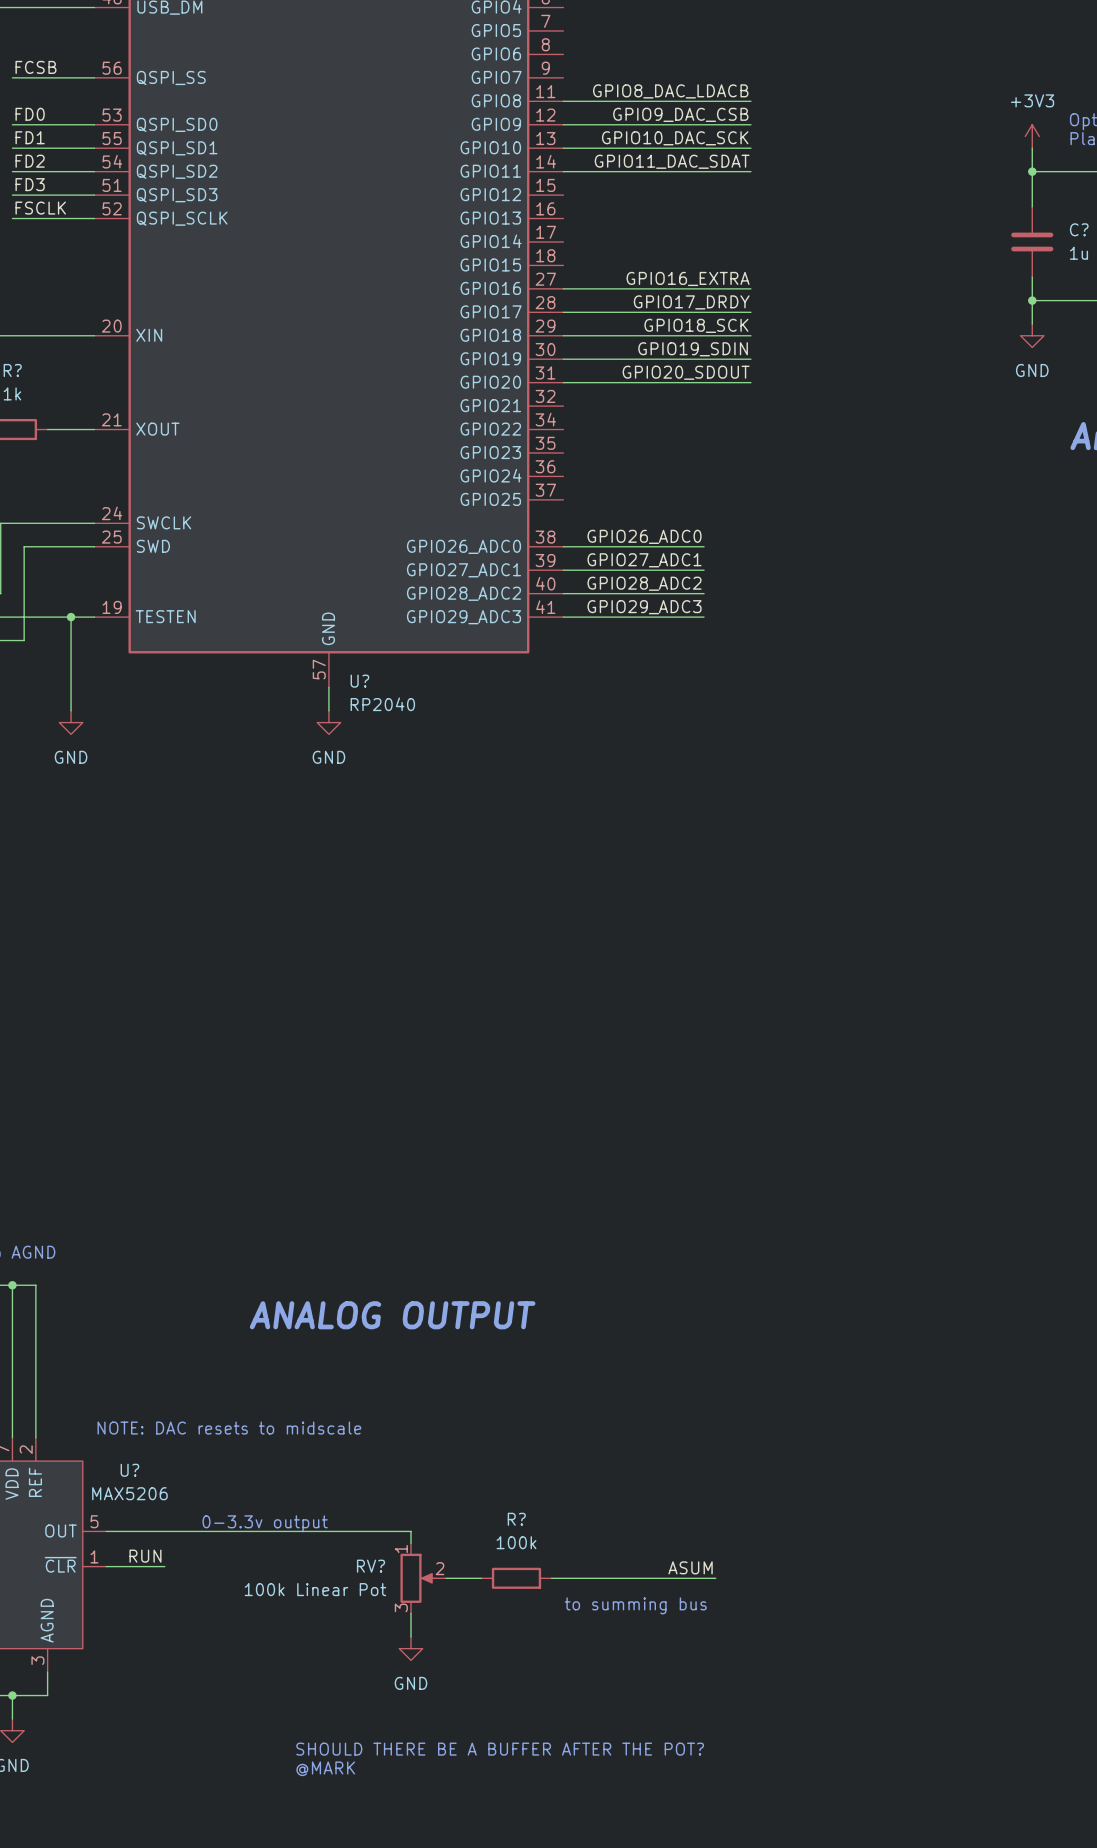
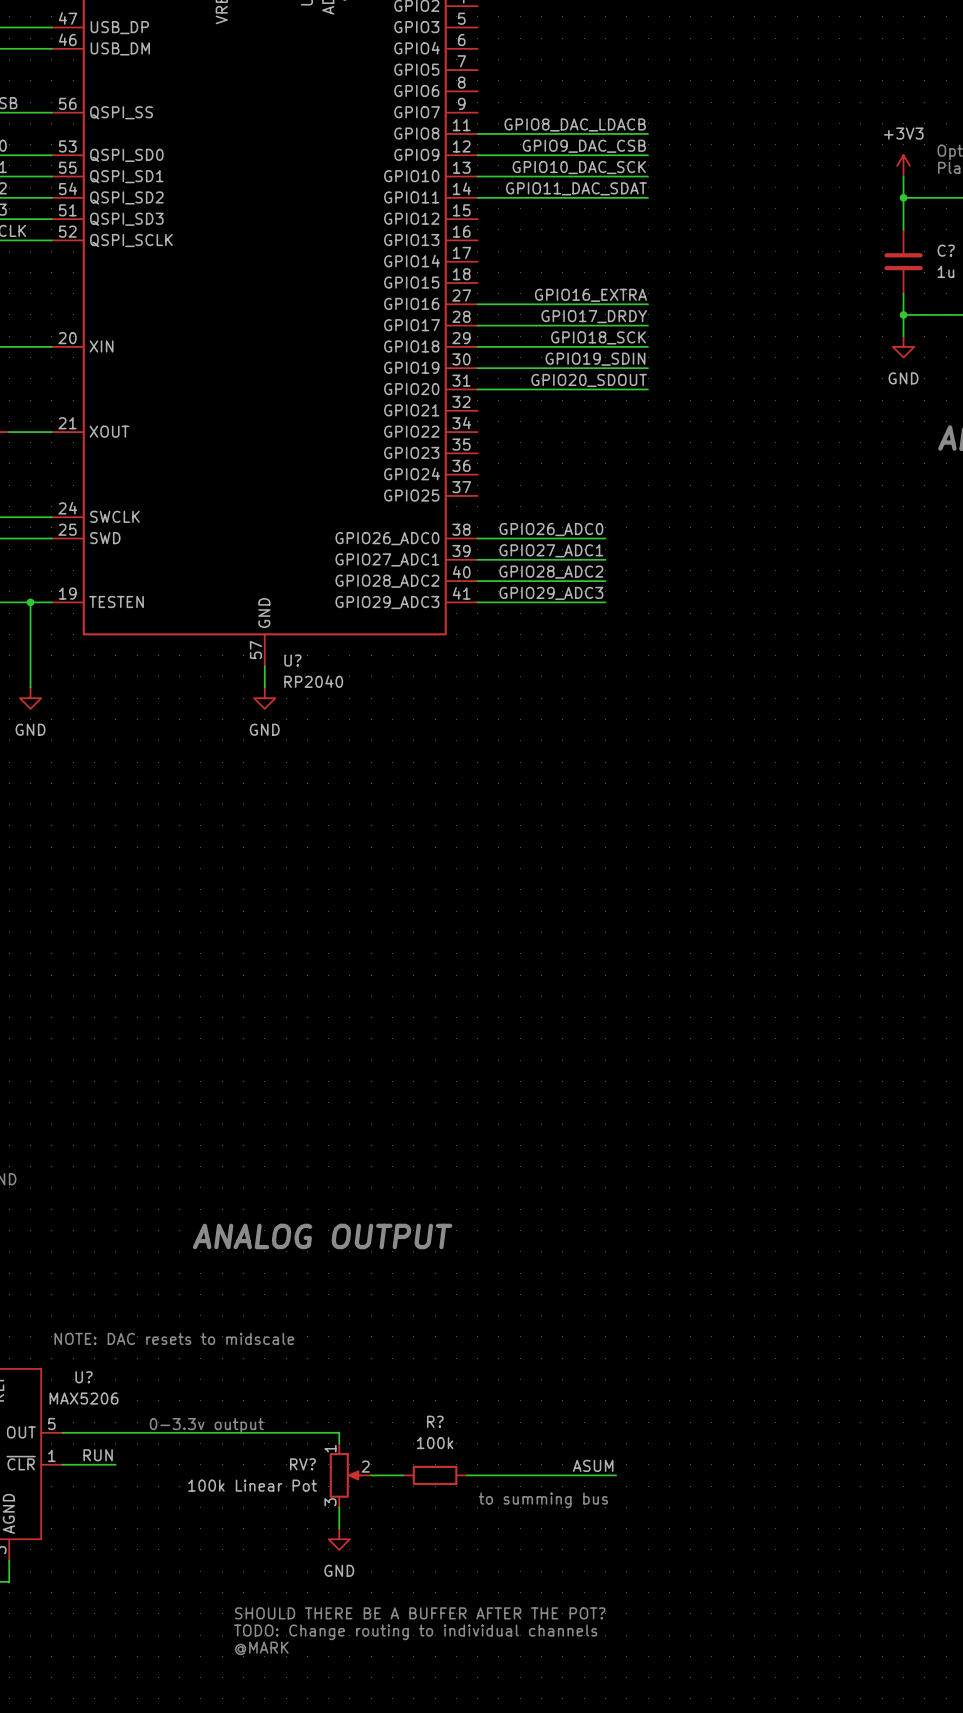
text: none -> SHOULD THERE BE A BUFFER AFTER THE POT? (420, 1613)
text: SHOULD THERE BE A BUFFER AFTER THE POT? (500, 1749) -> TODO: Change routing to individual channels (415, 1632)

